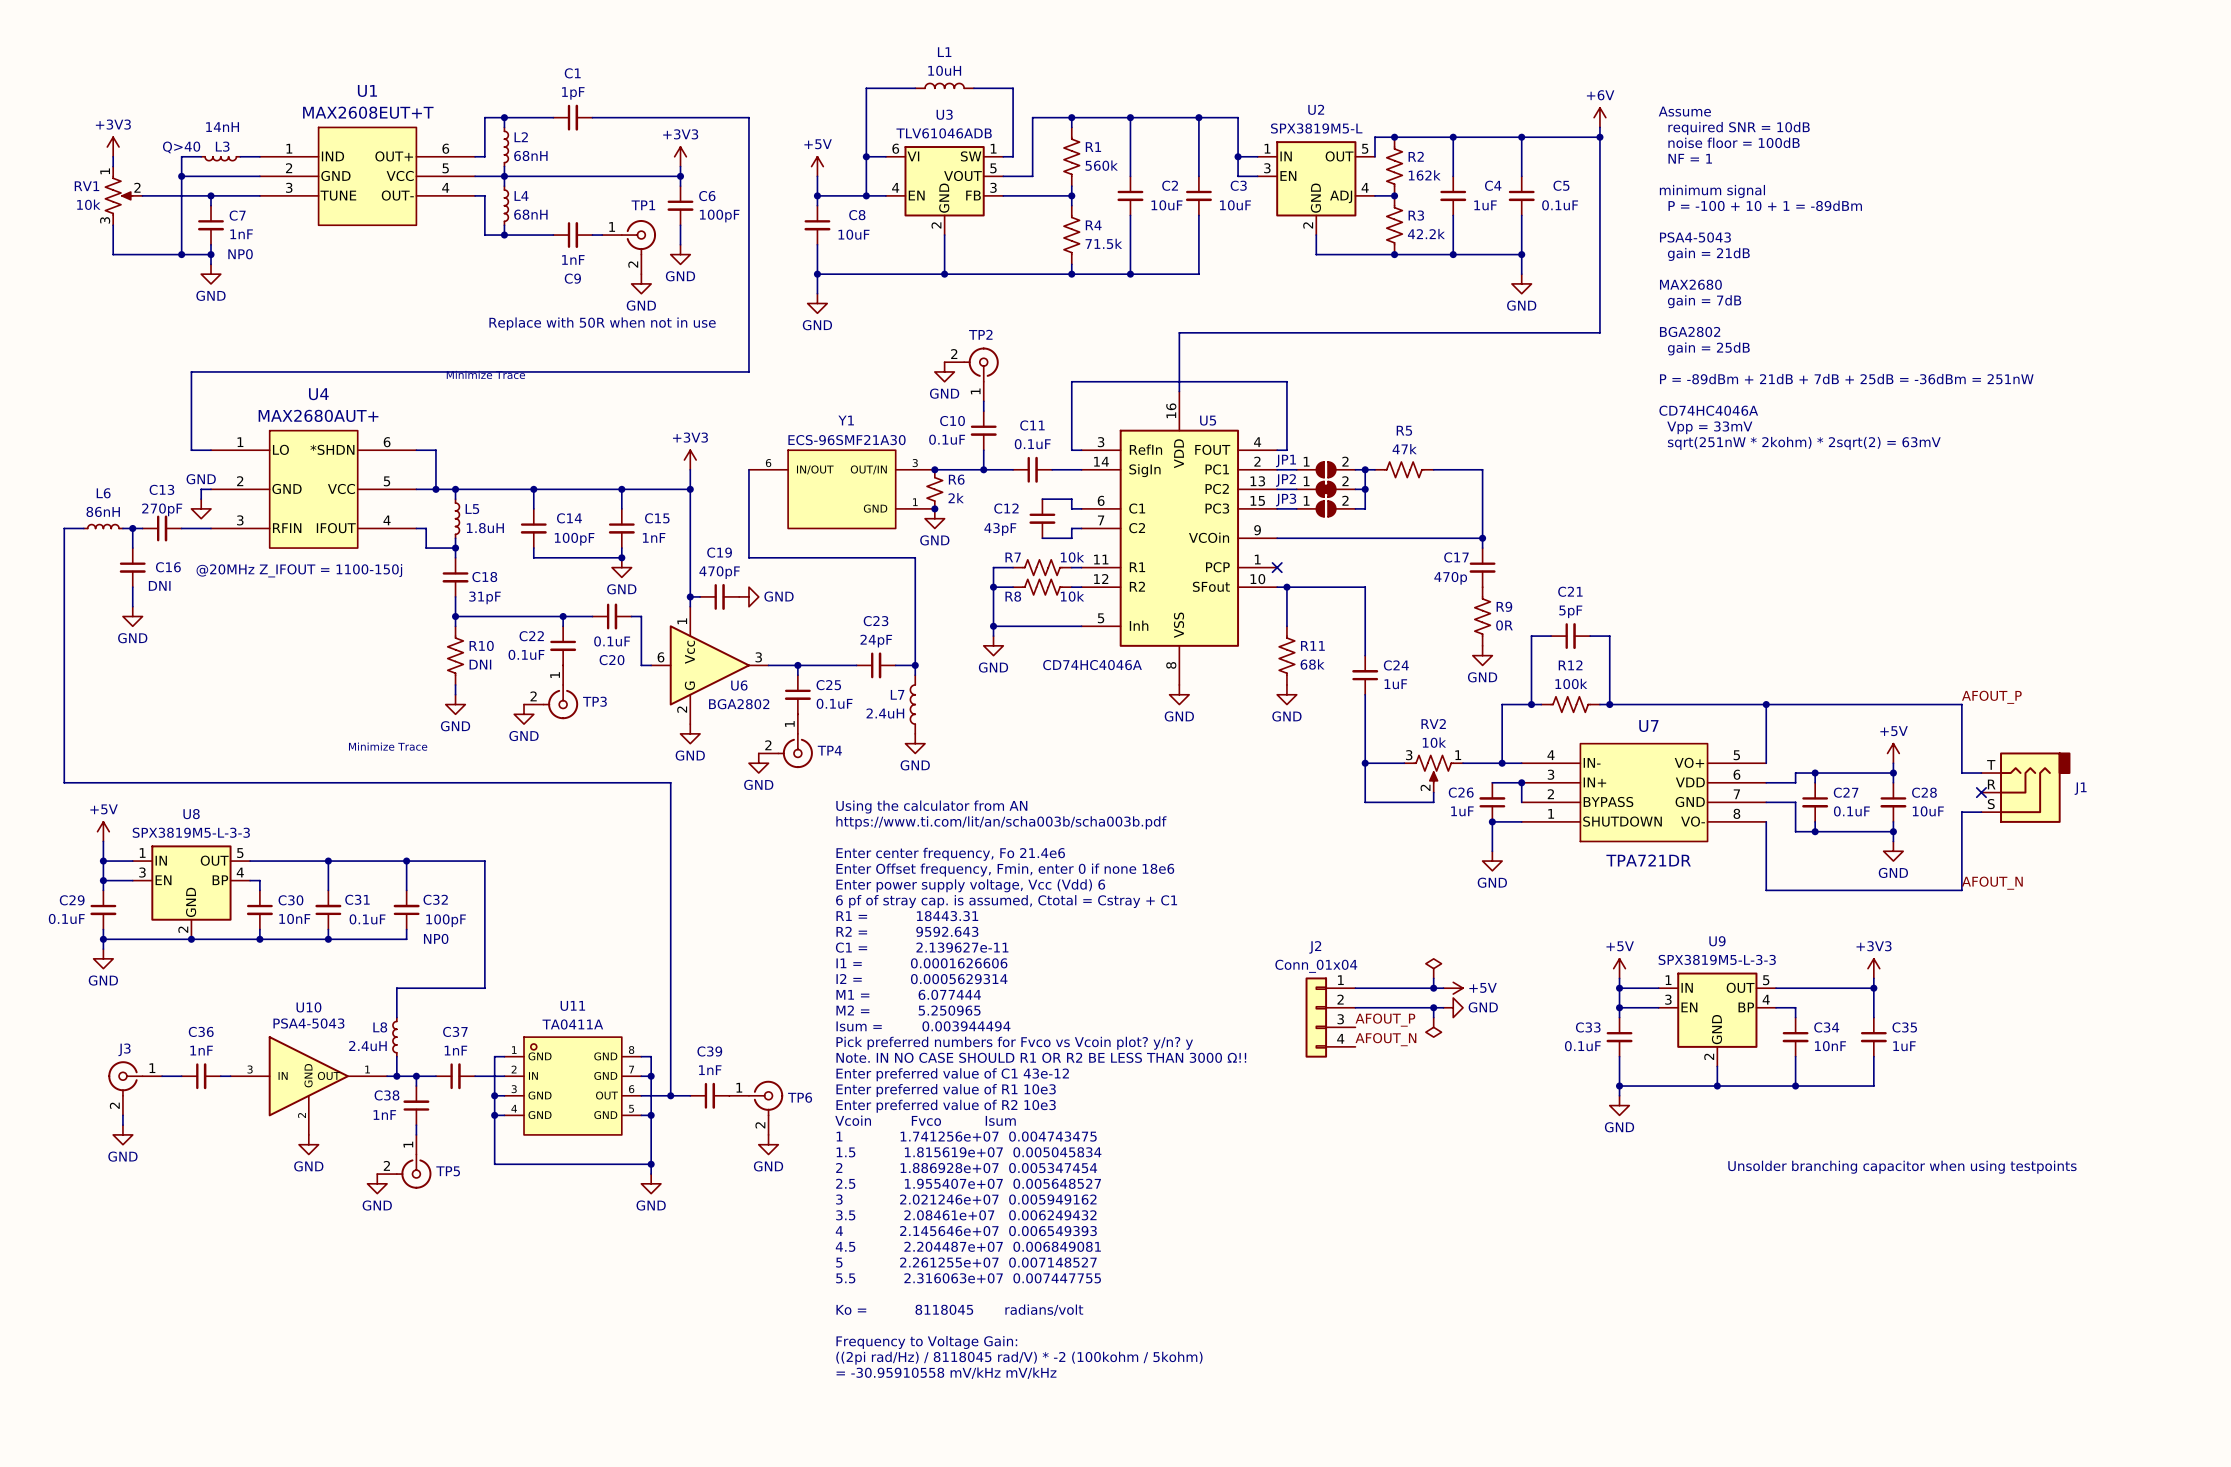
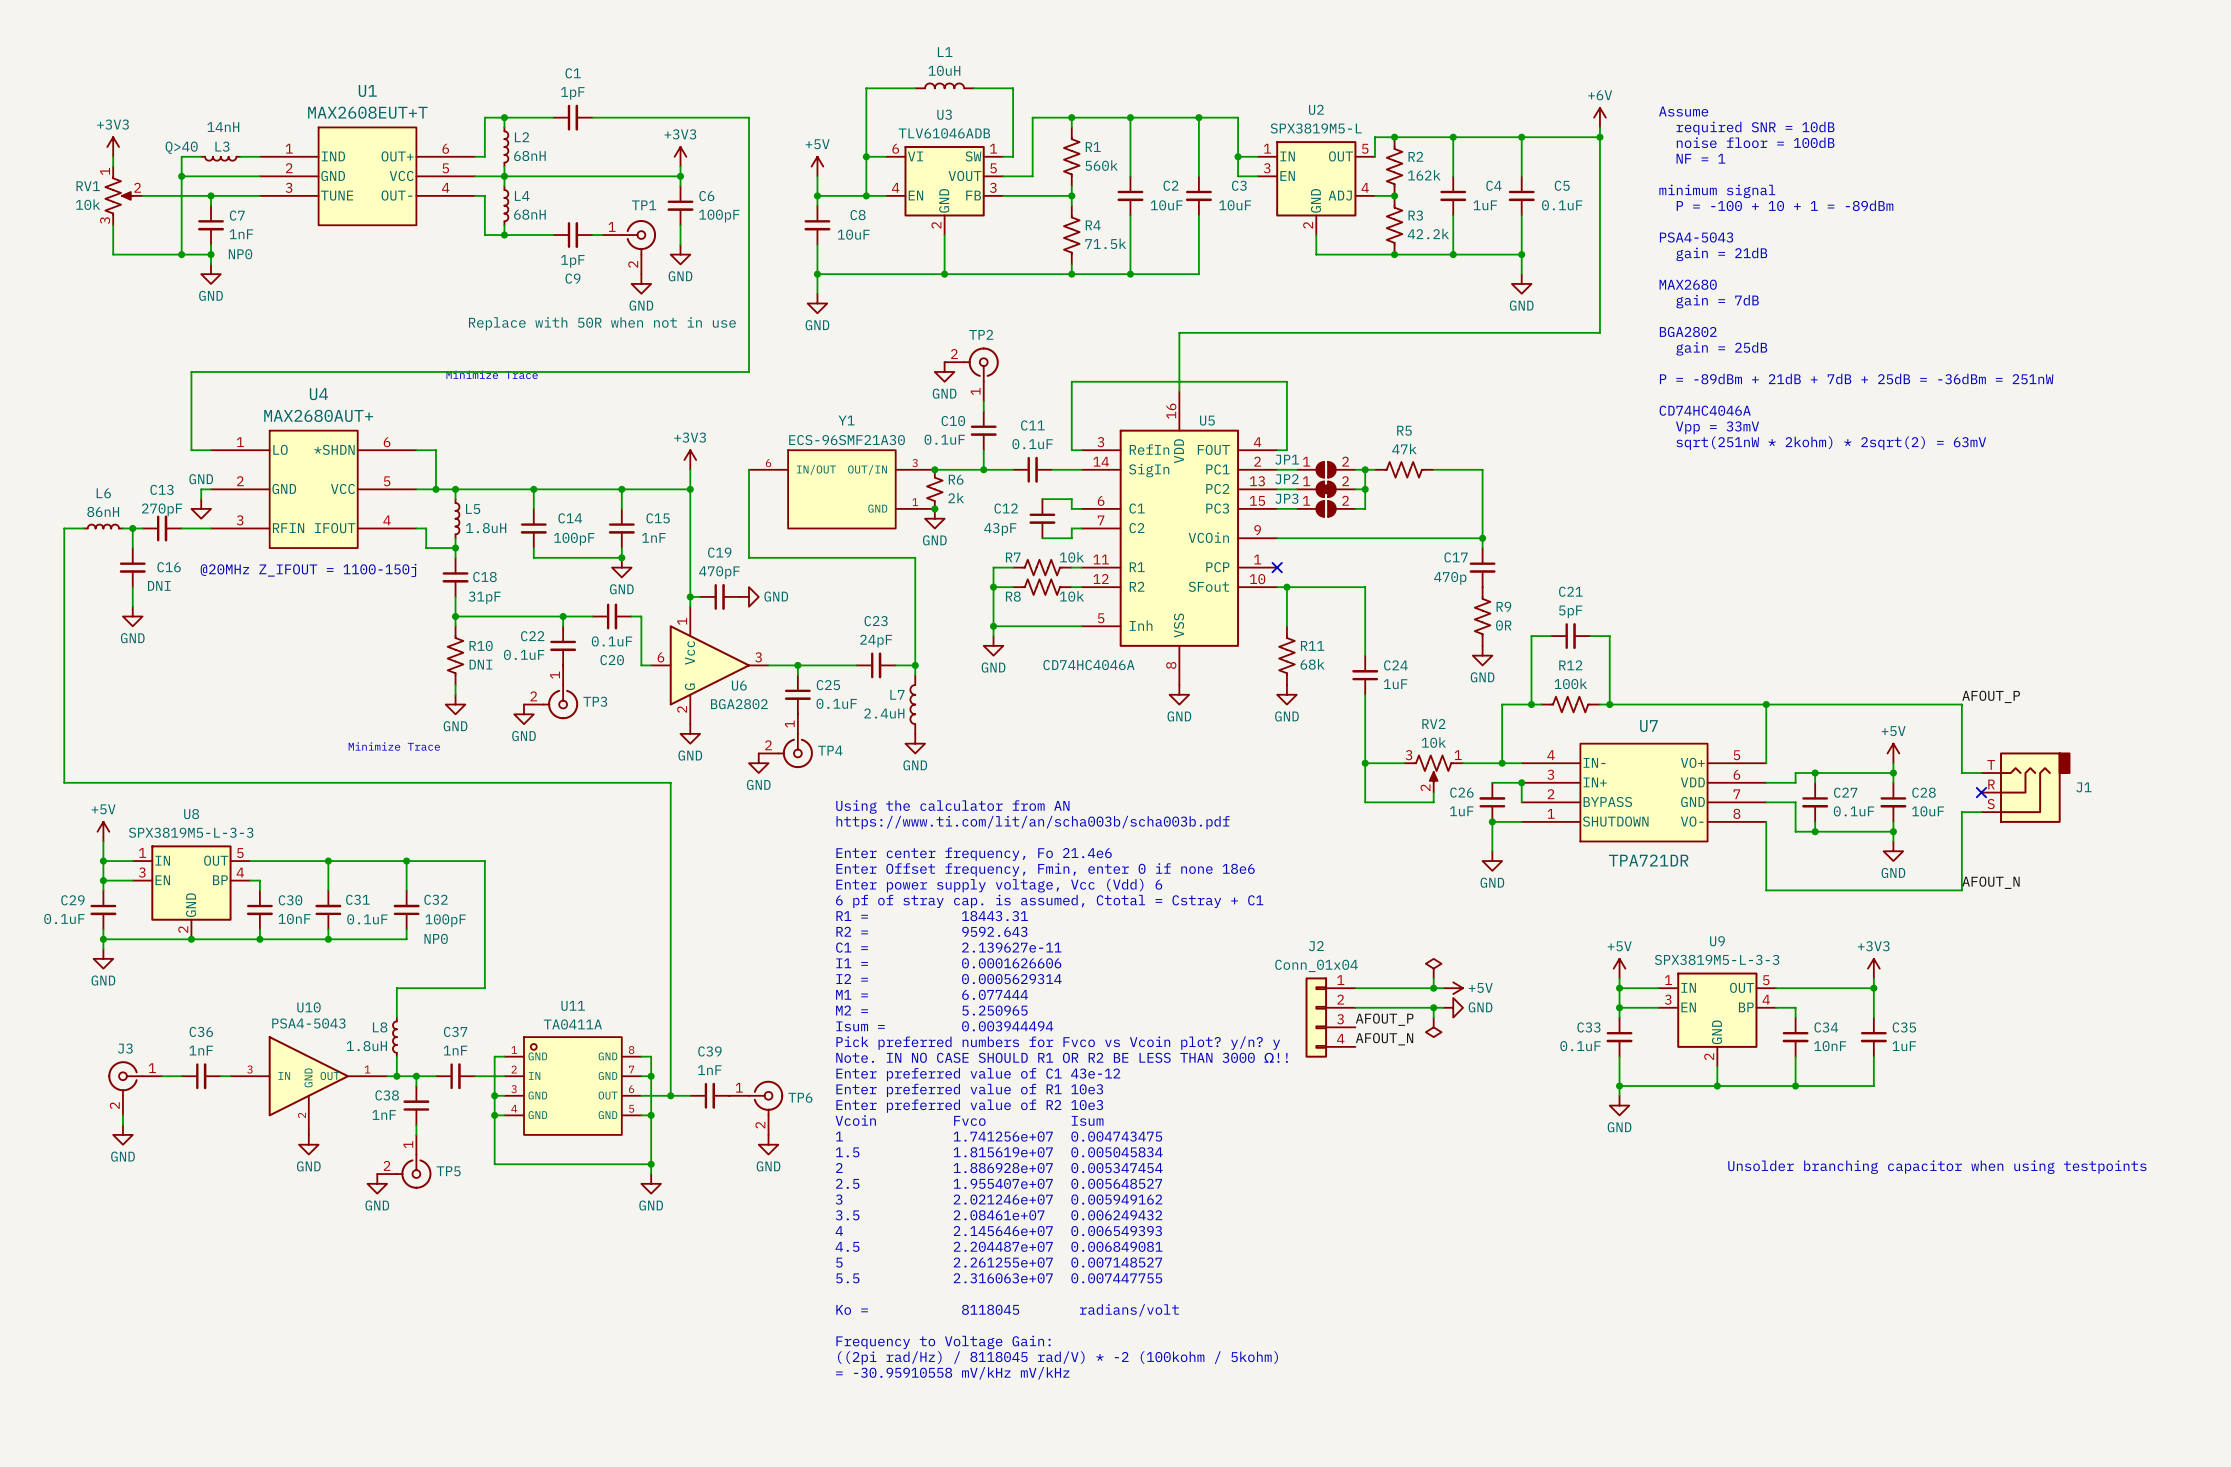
C9 value: 1nF (573, 259) -> 1pF (572, 261)
L8 value: 2.4uH (367, 1046) -> 1.8uH (366, 1046)

